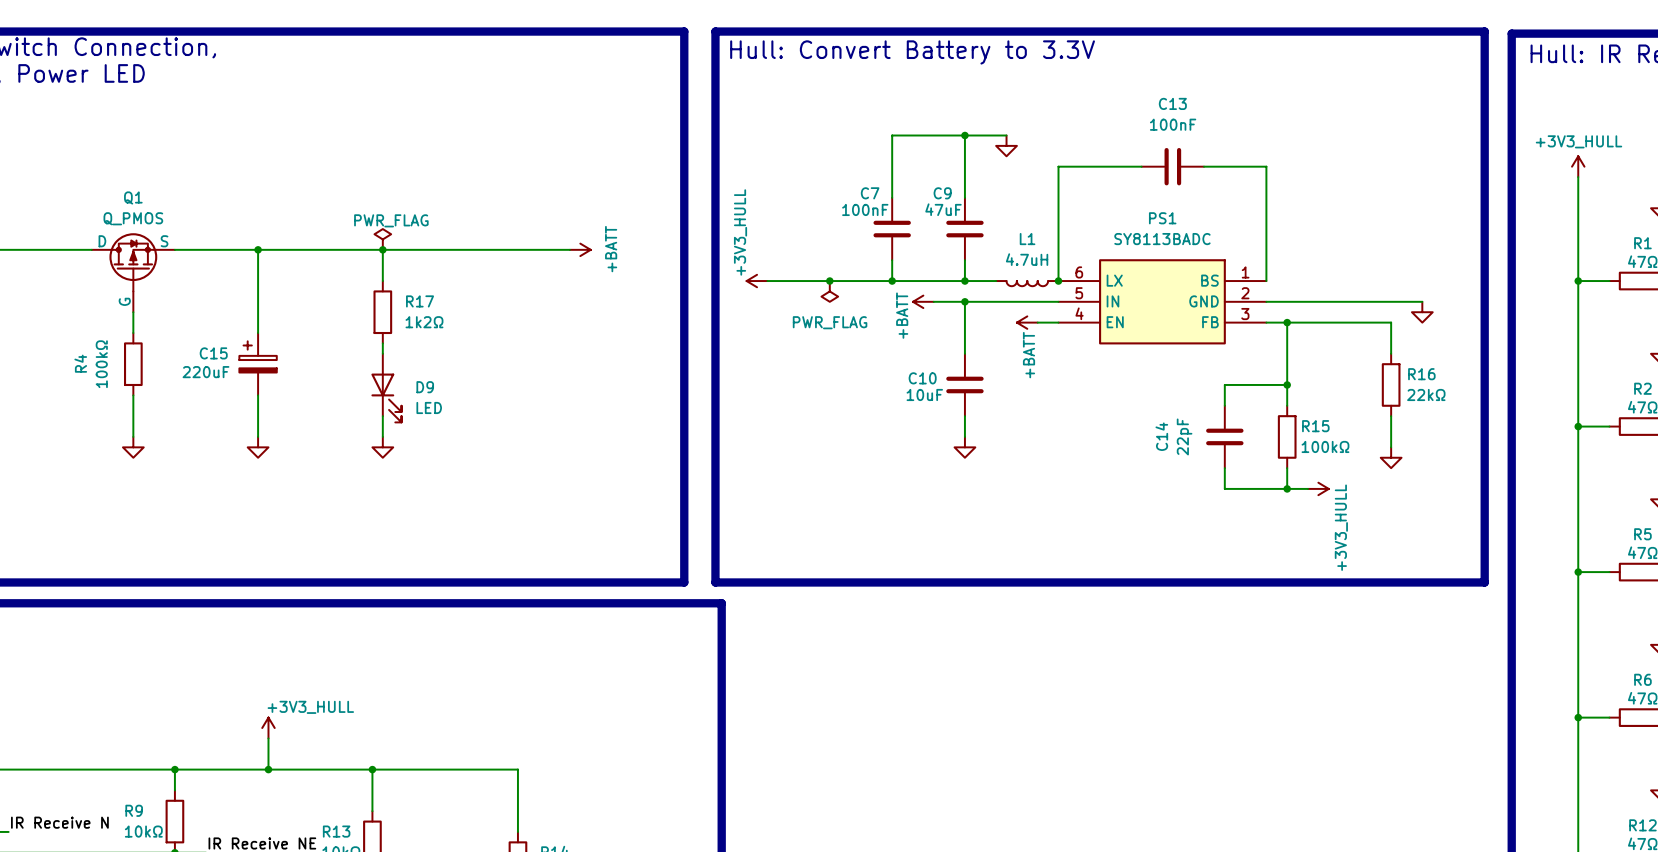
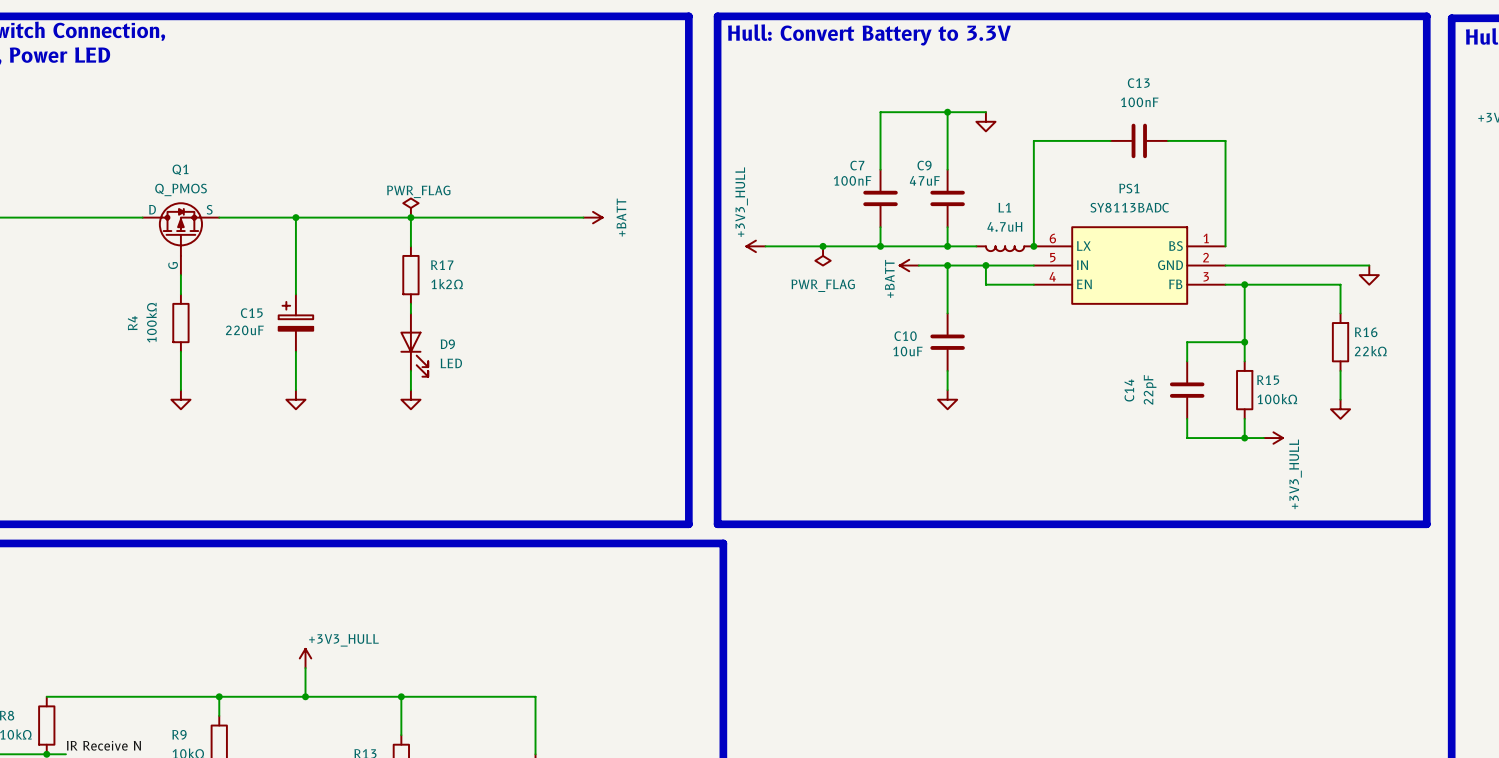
wire: none -> (985, 265) (985, 284) (1014, 284)
junction: none -> (985, 265)
power symbol: +BATT (1027, 322) -> none

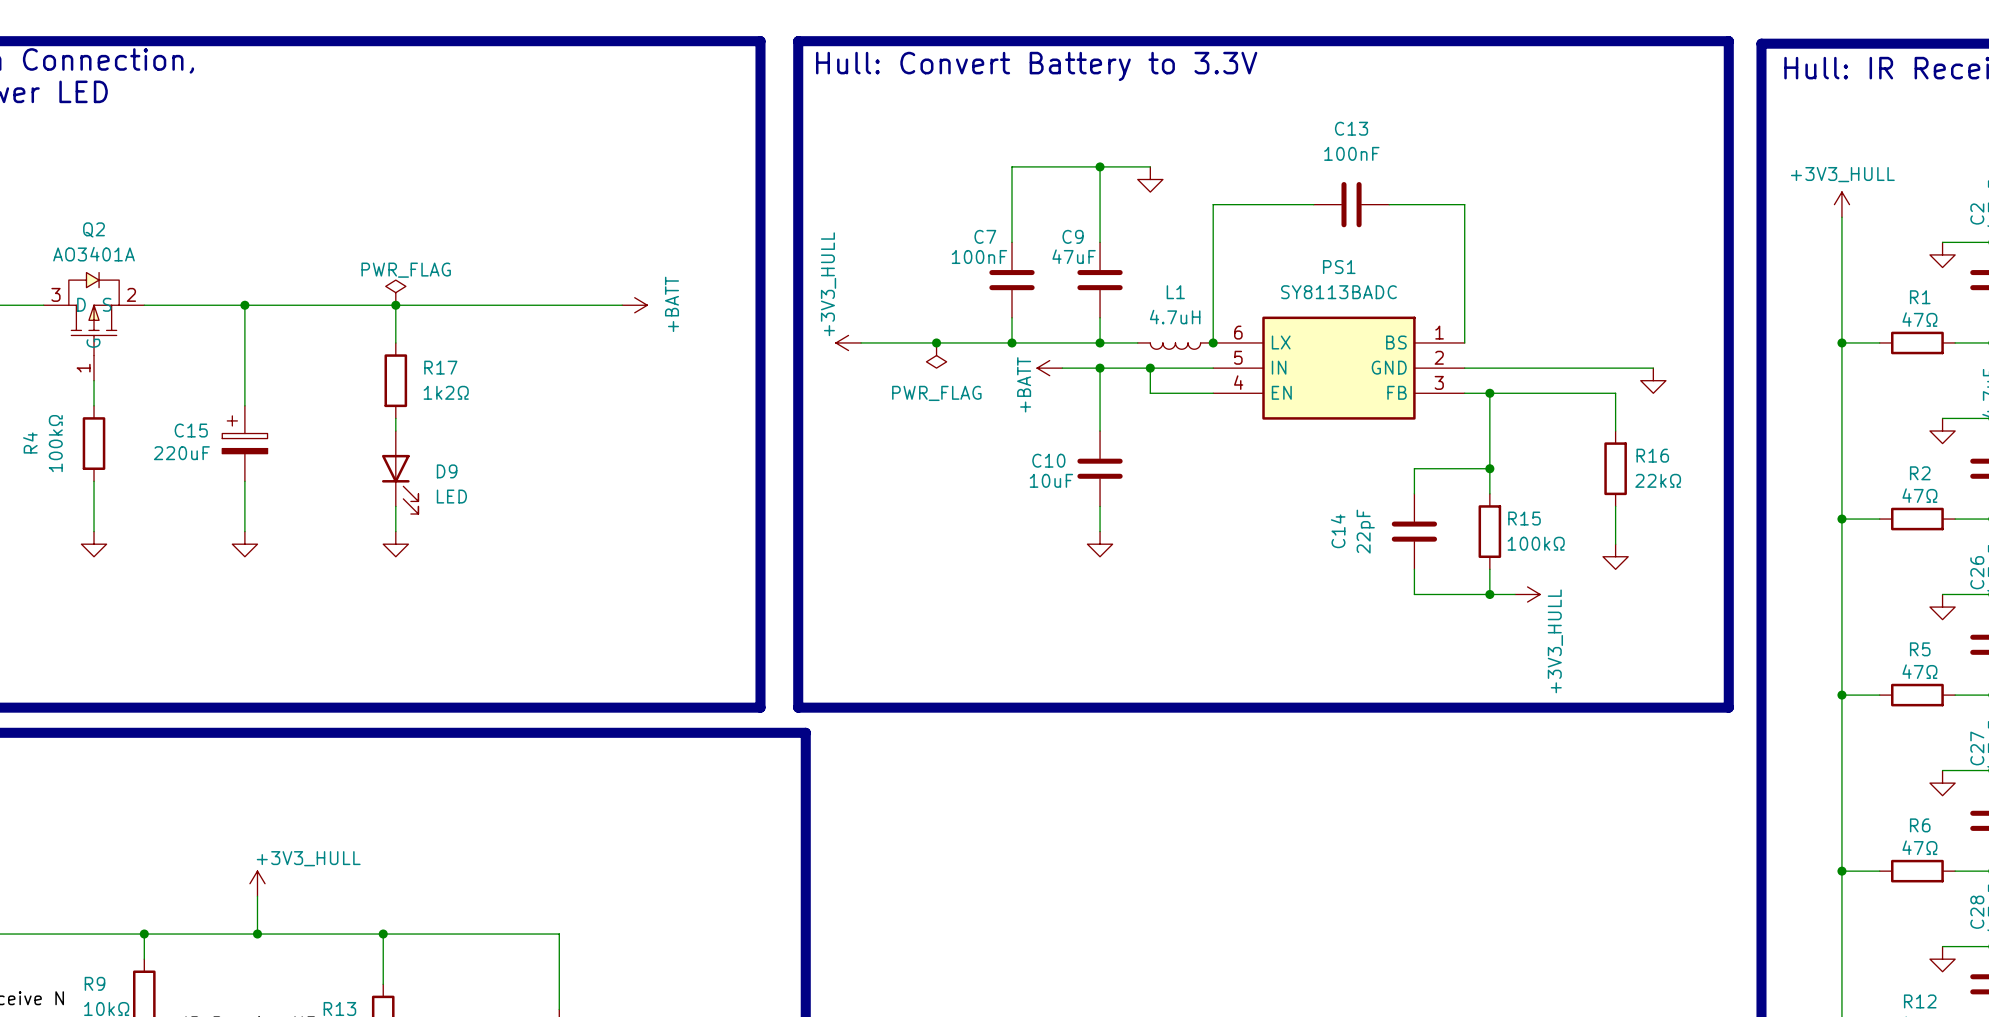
Q2: none -> AO3401A (94, 326)
Q1: Q_PMOS (180, 238) -> none

